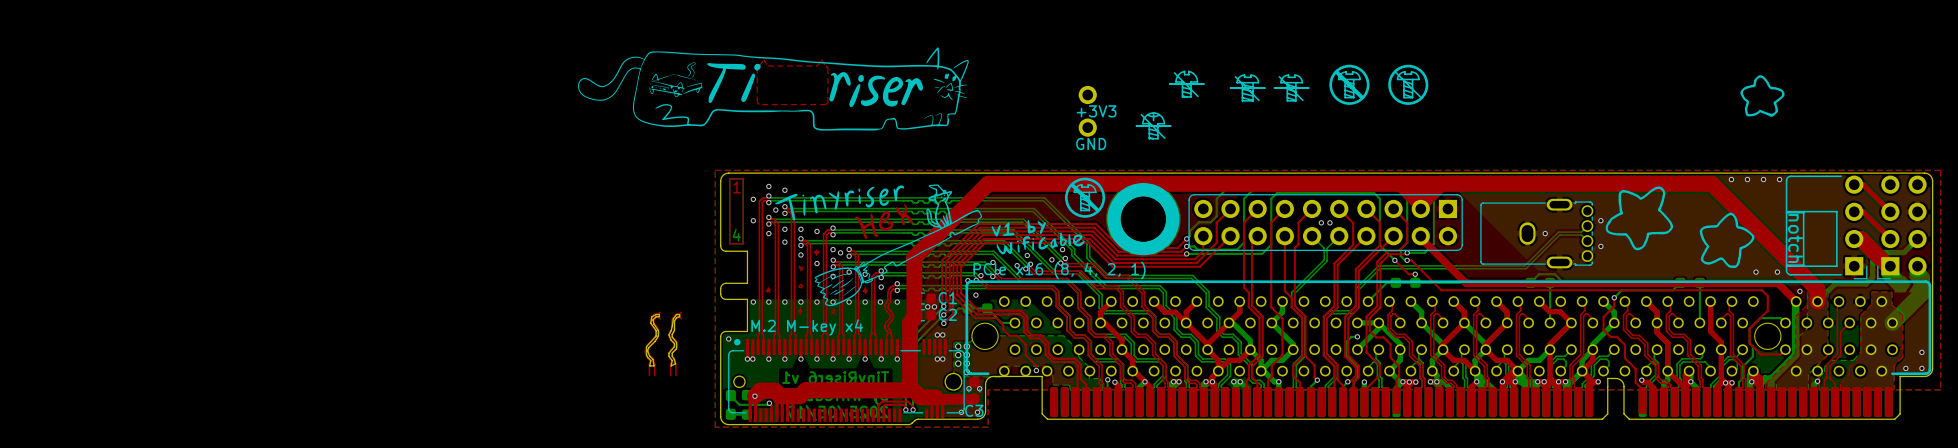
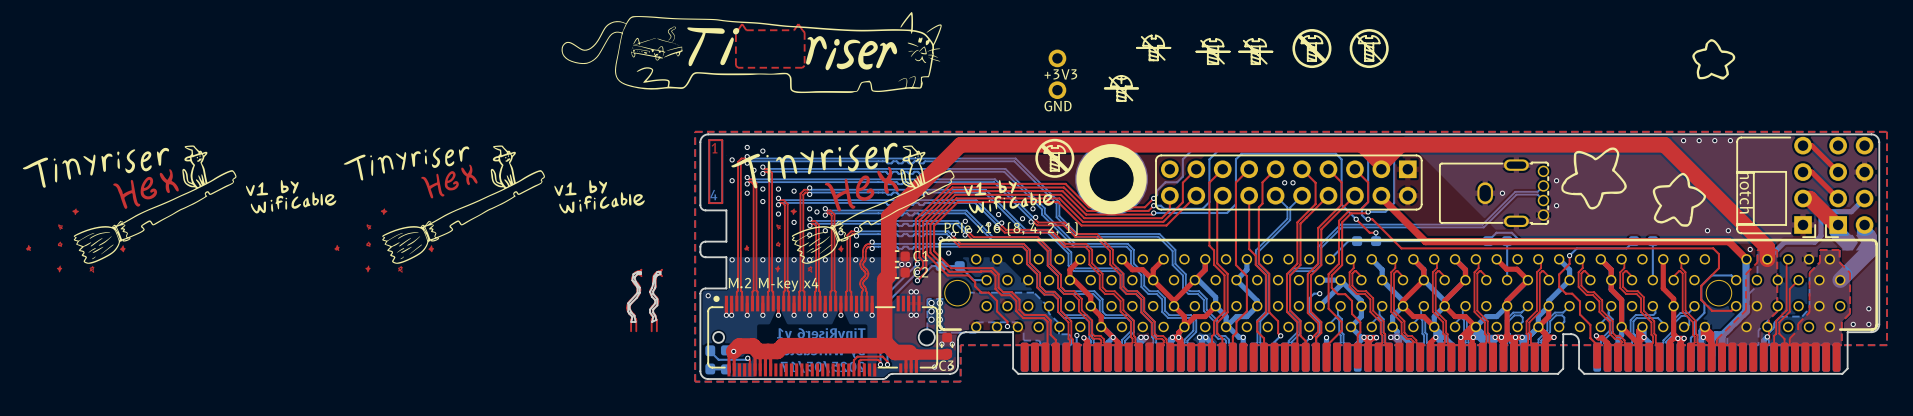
drawing: none -> [726, 142, 1055, 264]
drawing: none -> [22, 145, 645, 273]
drawing: [775, 184, 1085, 307] -> none
drawing shape: [765, 204, 913, 316] -> [744, 166, 899, 273]

